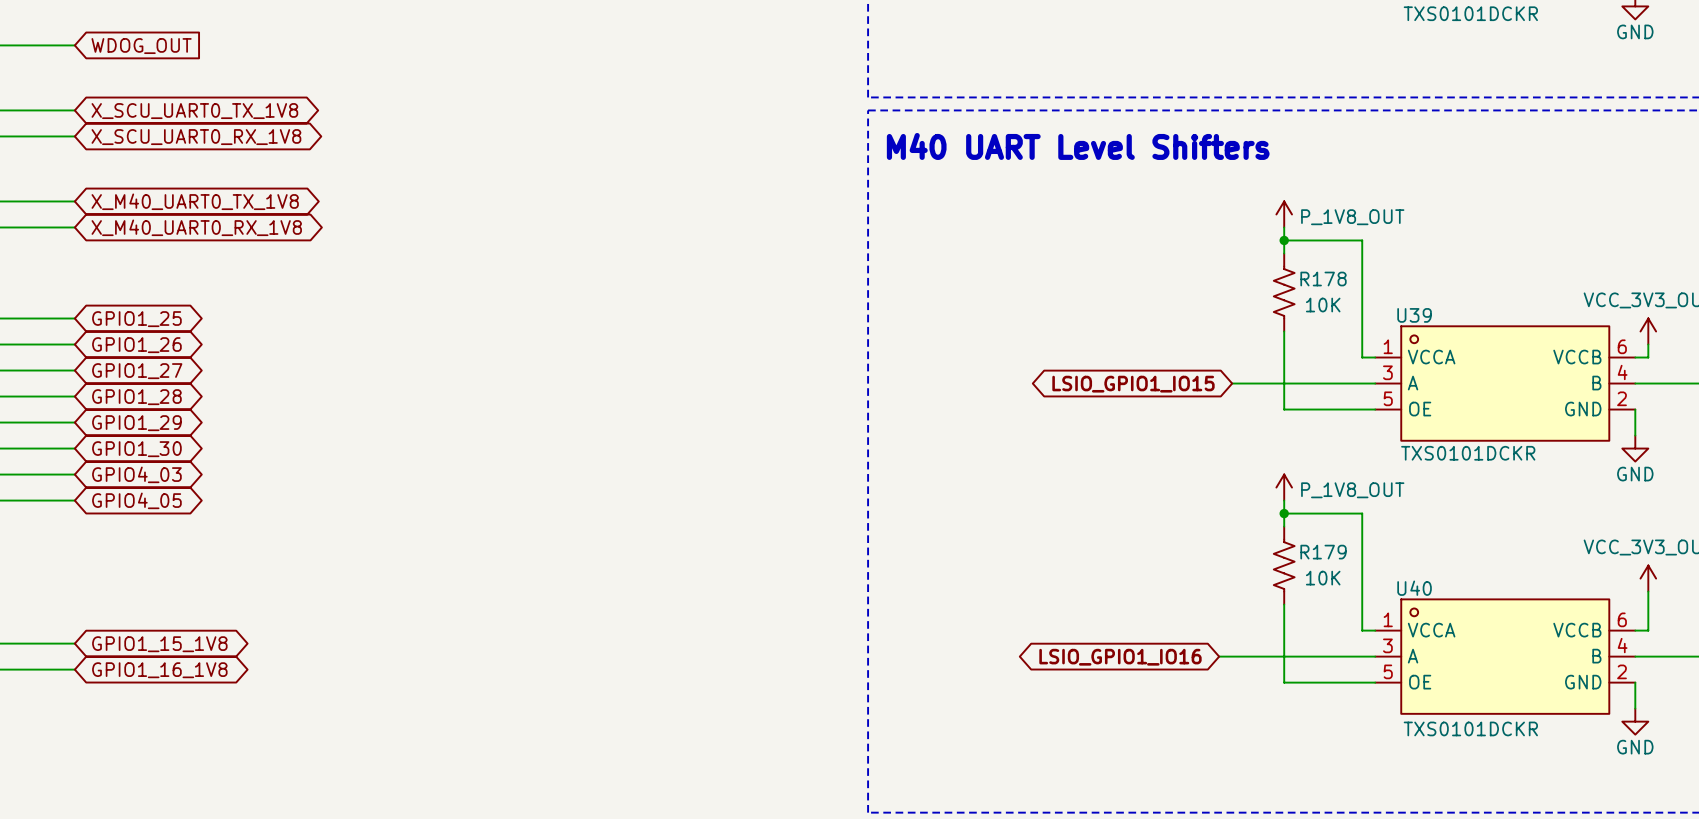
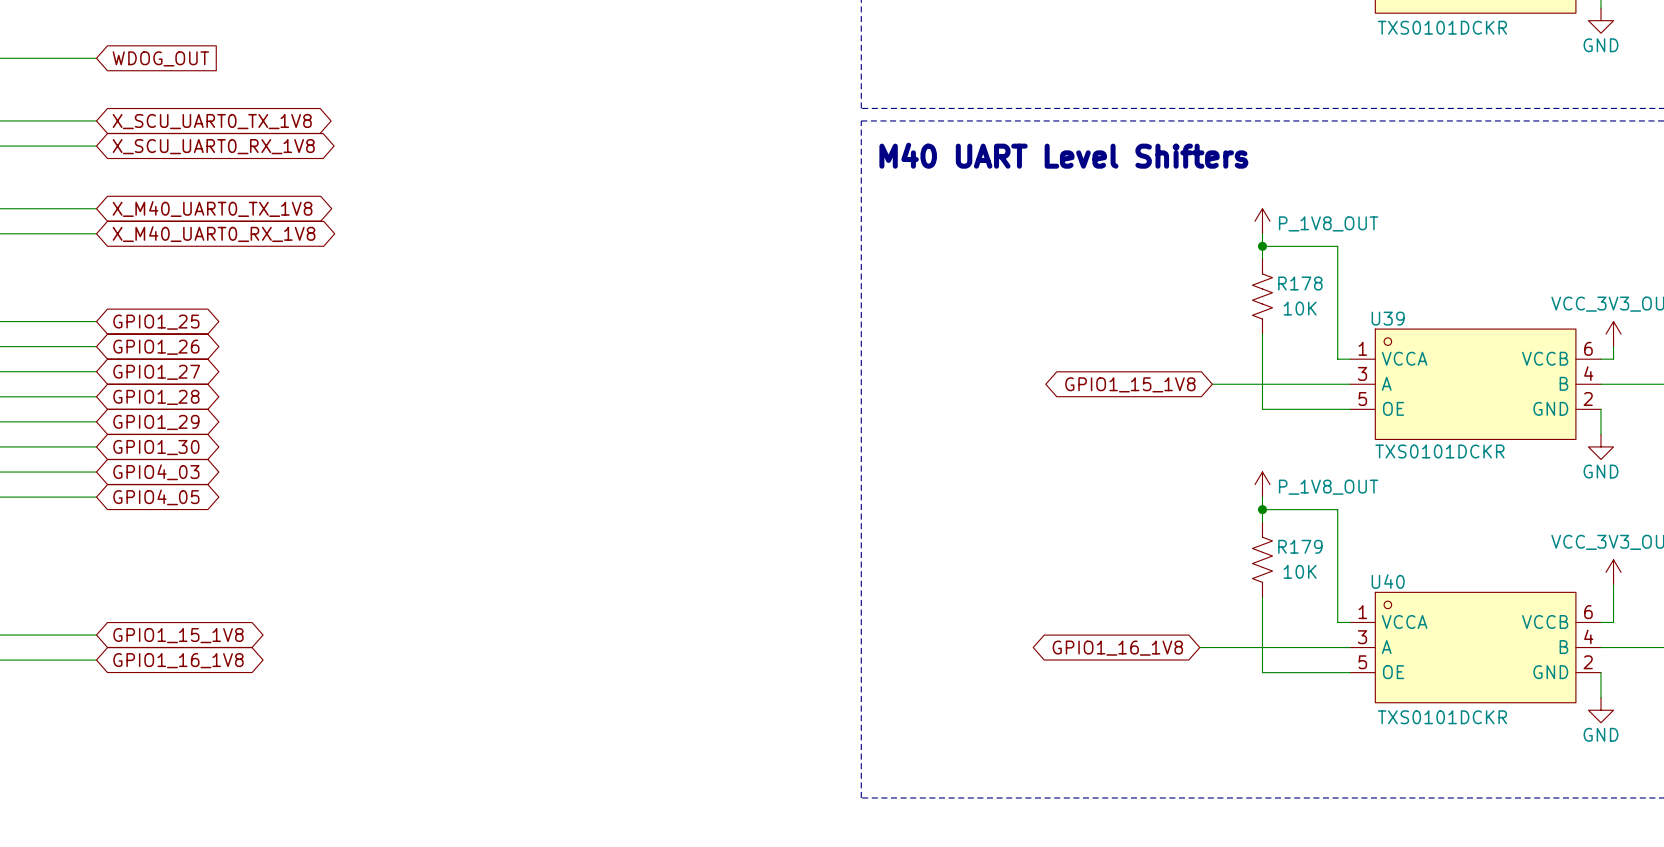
global label: LSIO_GPIO1_IO15 (1133, 384) -> GPIO1_15_1V8 (1130, 384)
global label: LSIO_GPIO1_IO16 (1120, 657) -> GPIO1_16_1V8 (1117, 648)

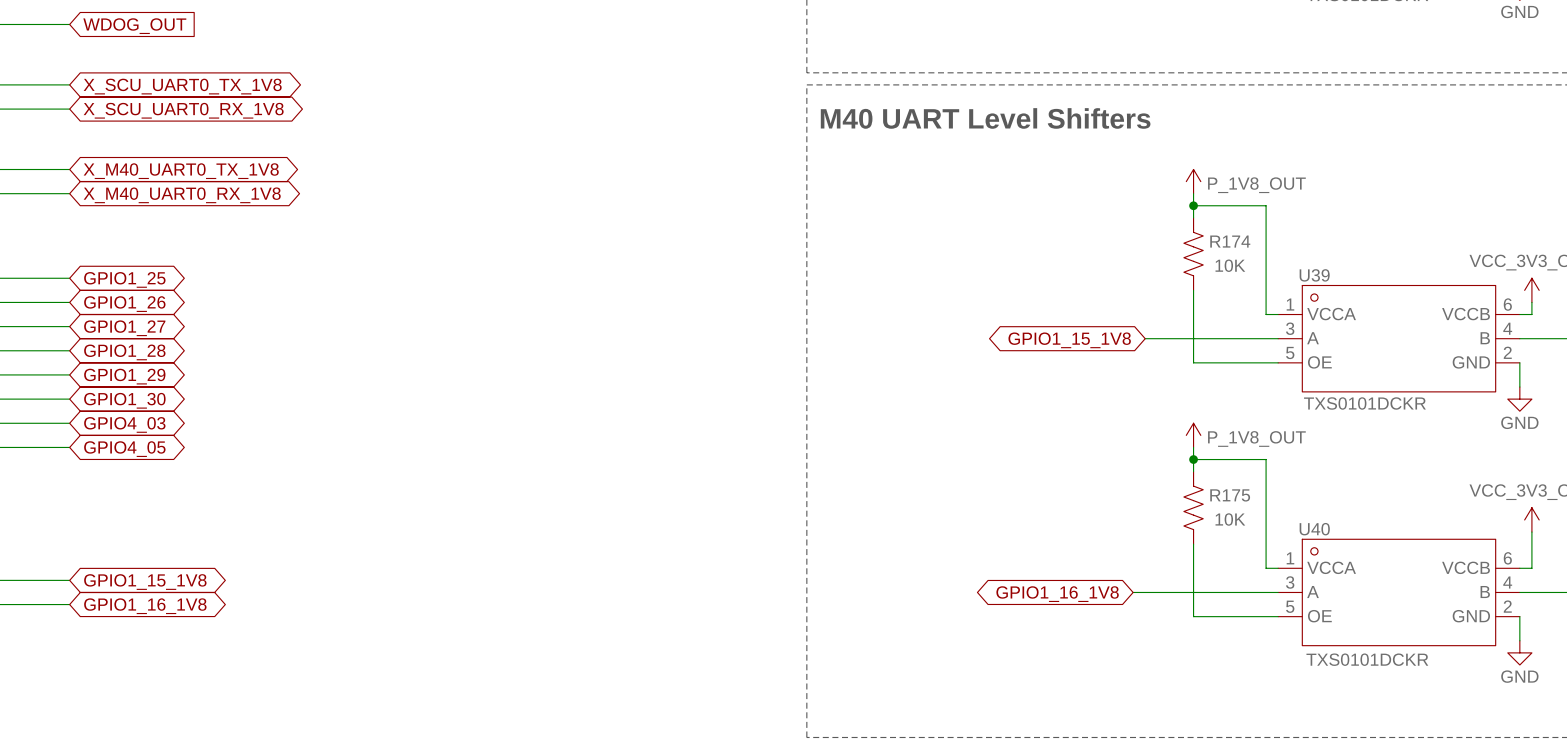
R178 name: R178 (1300, 283) -> R174 (1230, 241)
R179 name: R179 (1300, 546) -> R175 (1230, 495)

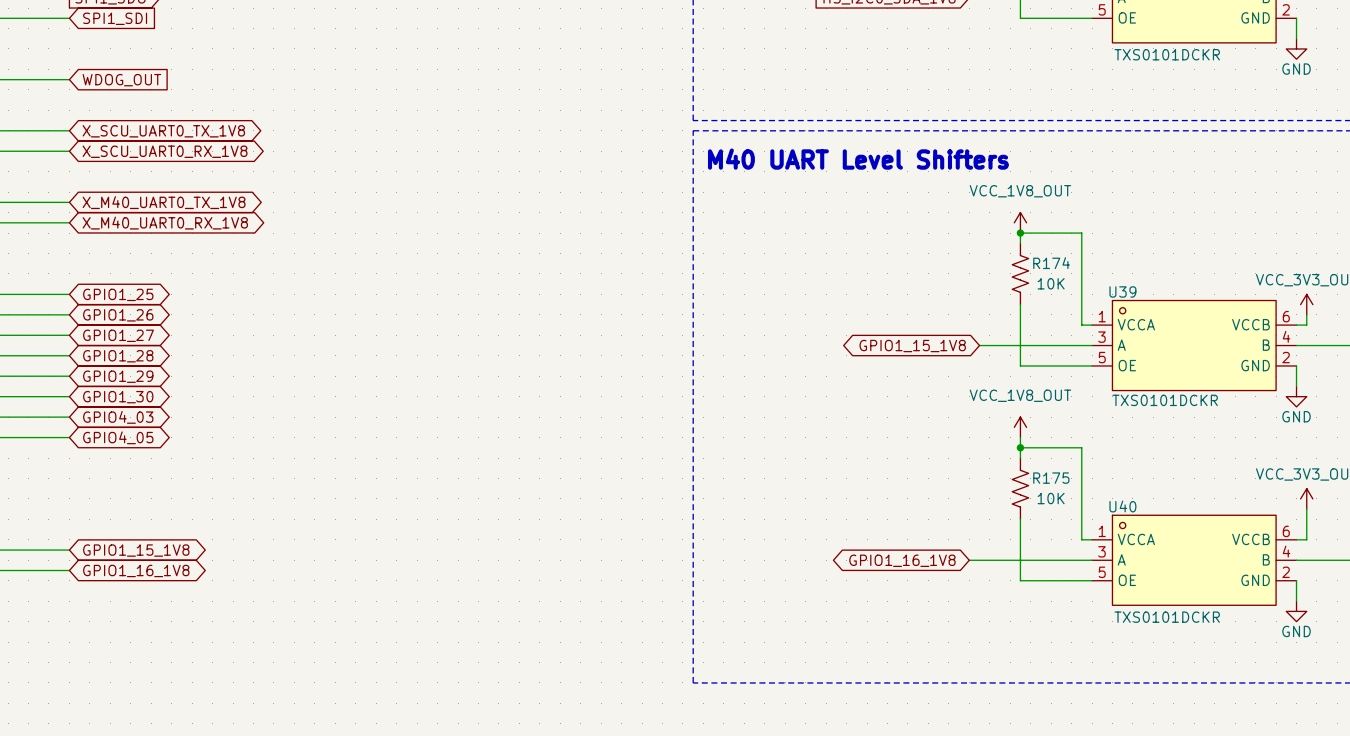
power symbol: P_1V8_OUT (1193, 181) -> none
power symbol: none -> VCC_1V8_OUT (1020, 222)
power symbol: P_1V8_OUT (1193, 435) -> VCC_1V8_OUT (1020, 427)

